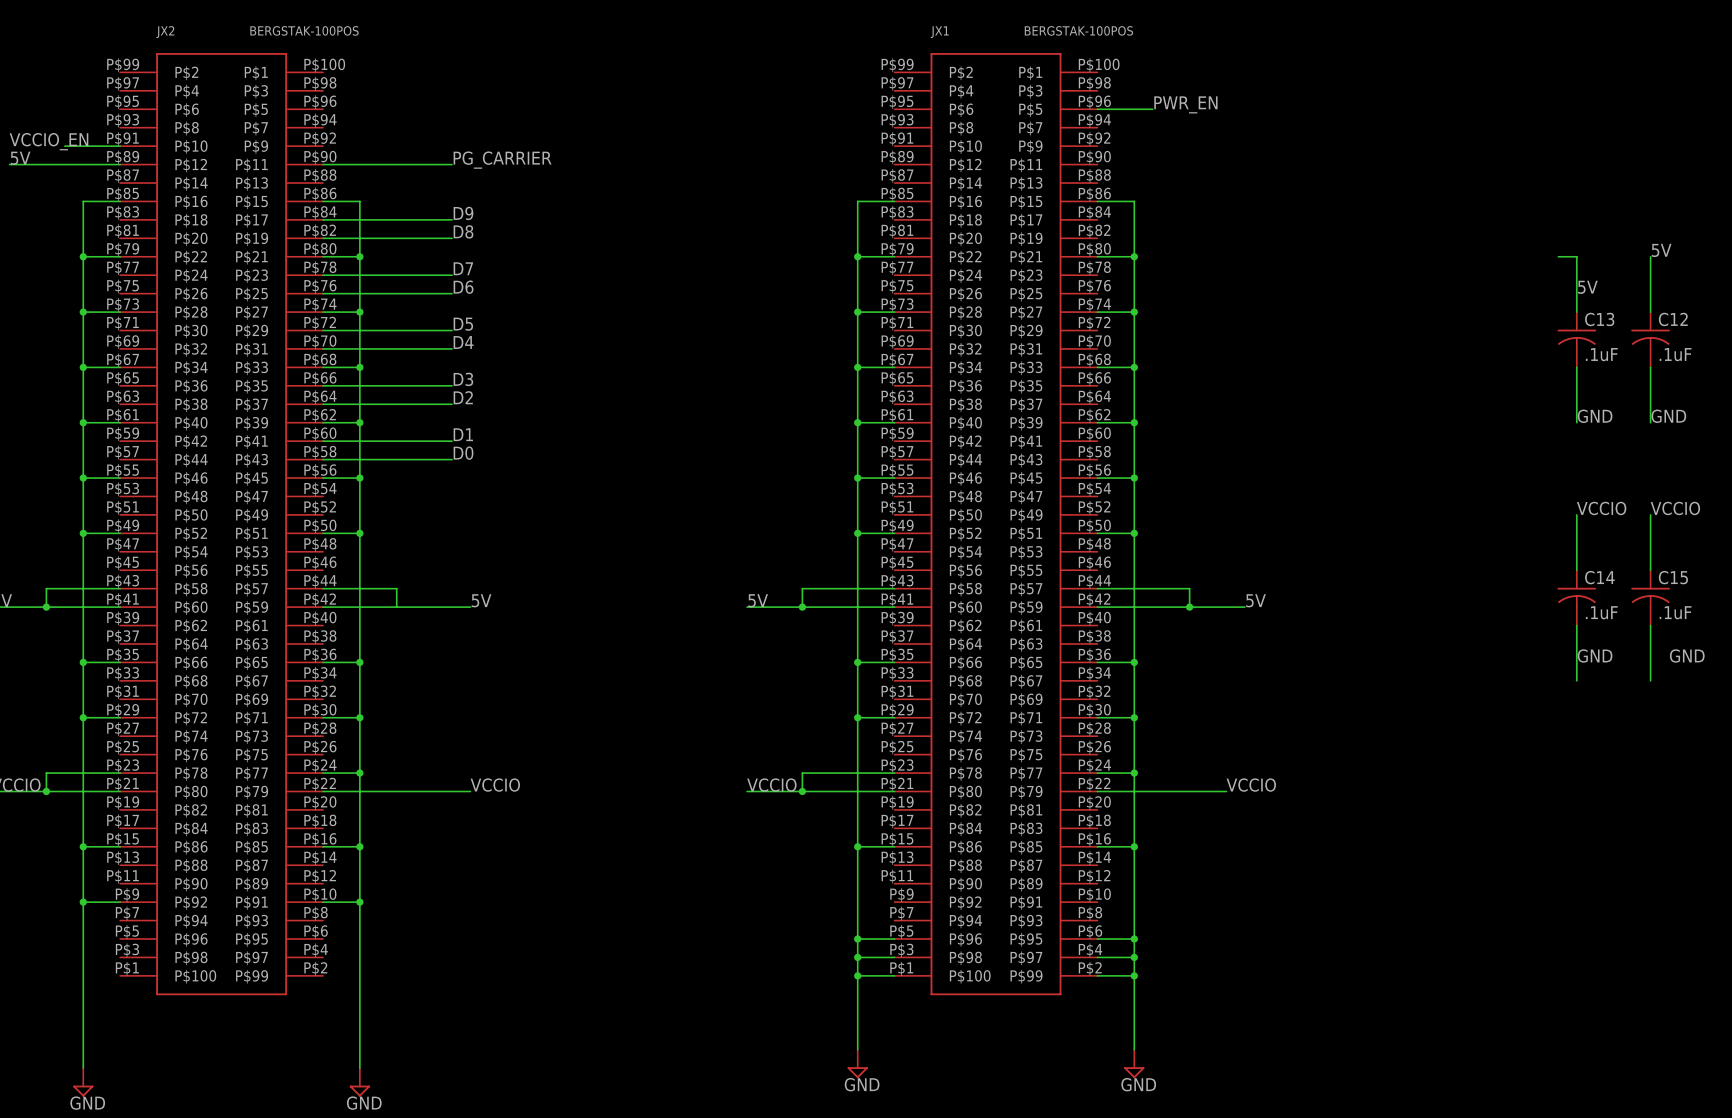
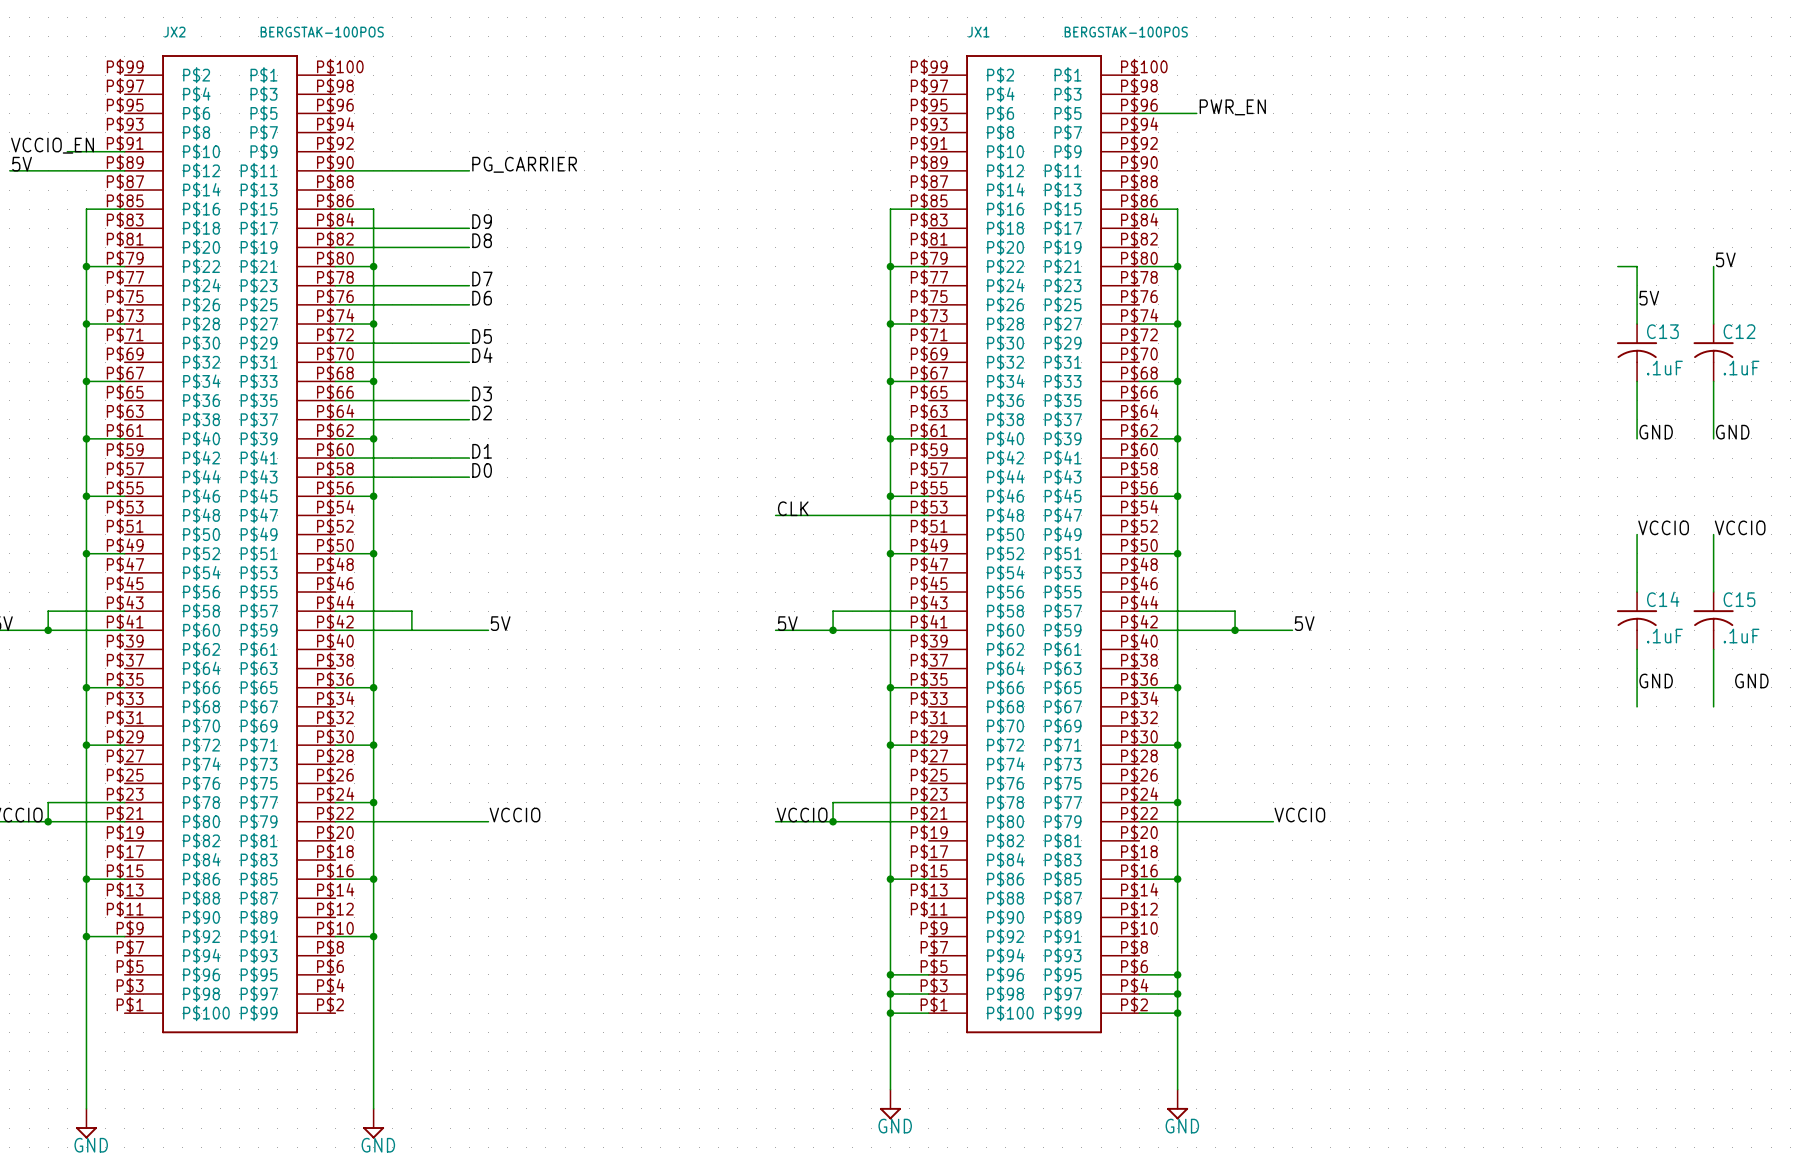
label: none -> CLK (793, 508)
wire: none -> (775, 515) (928, 515)

